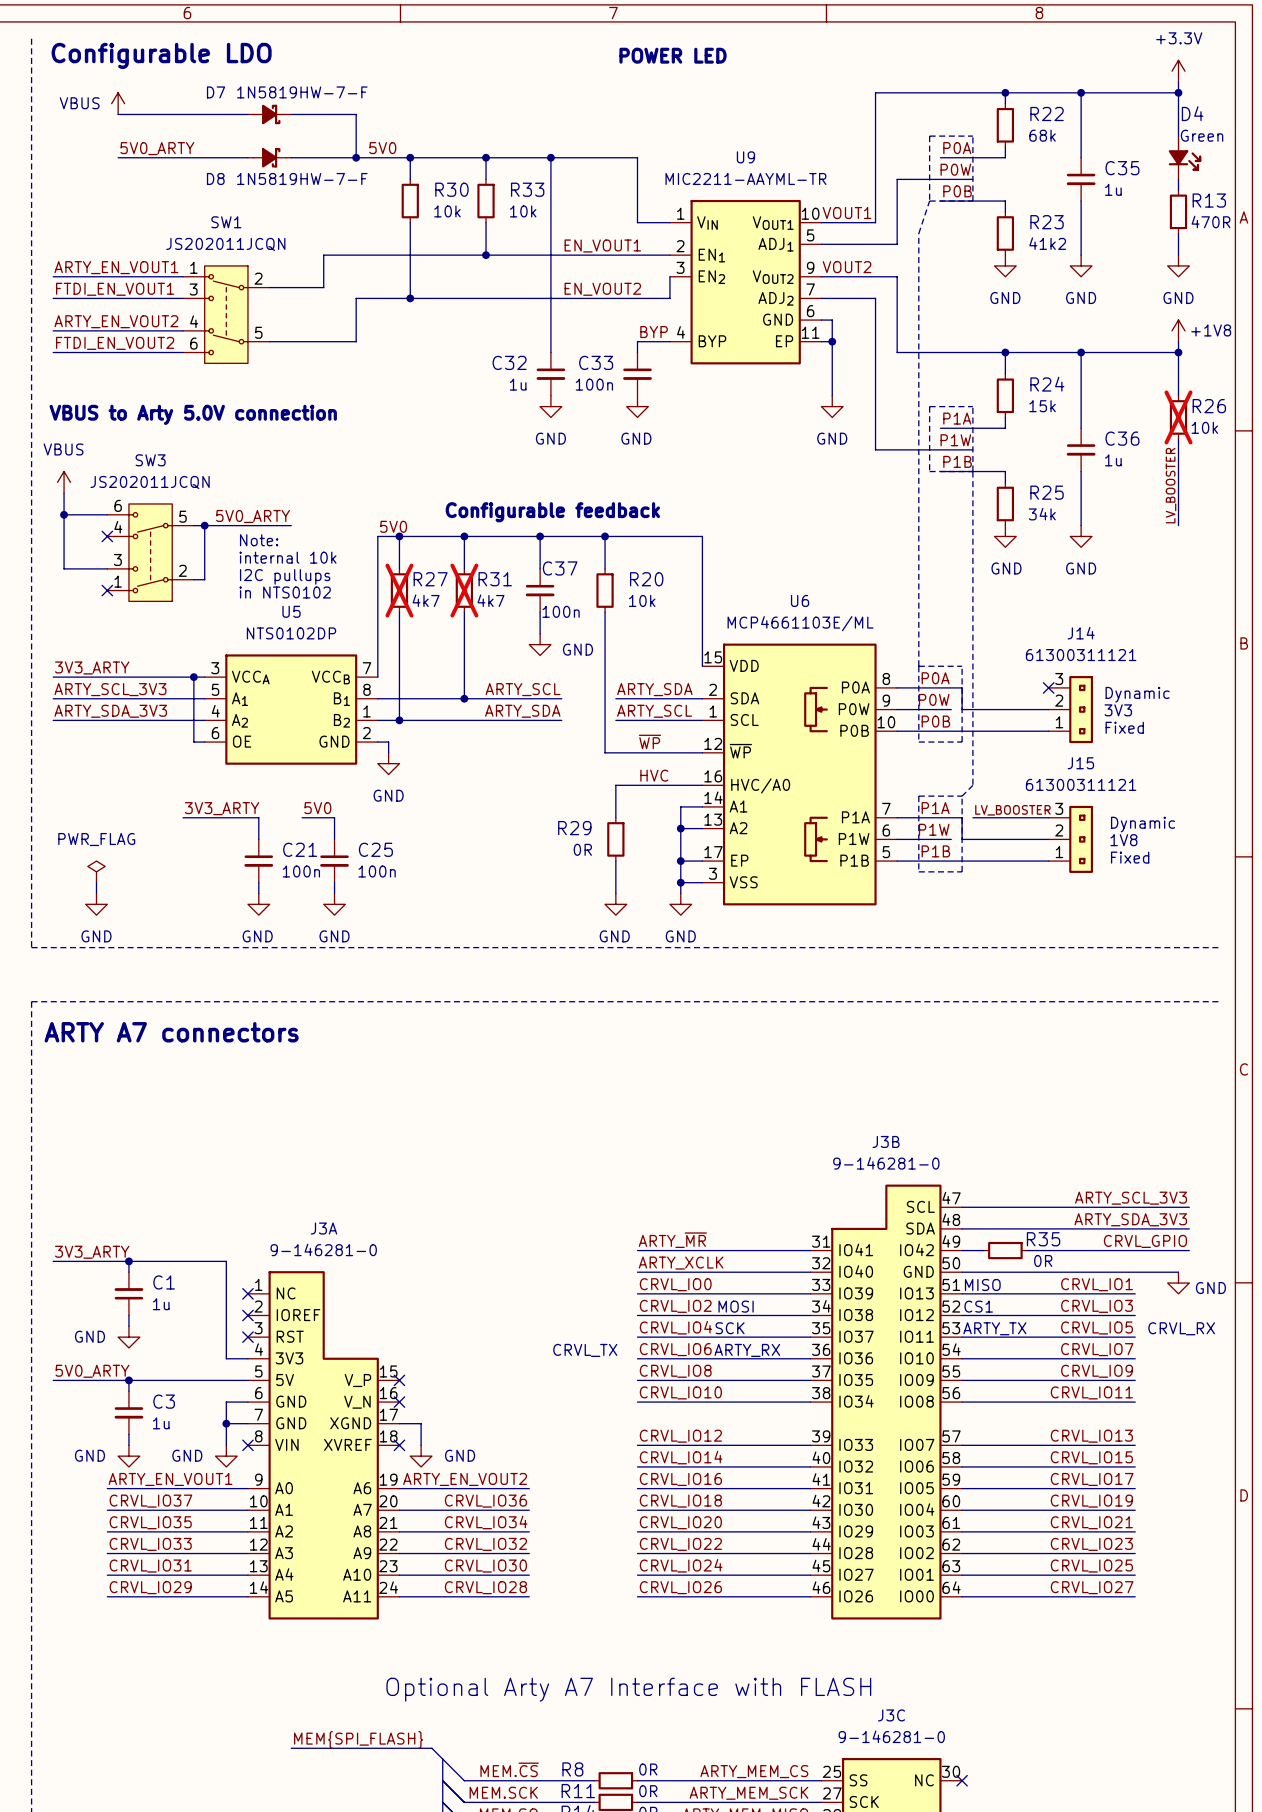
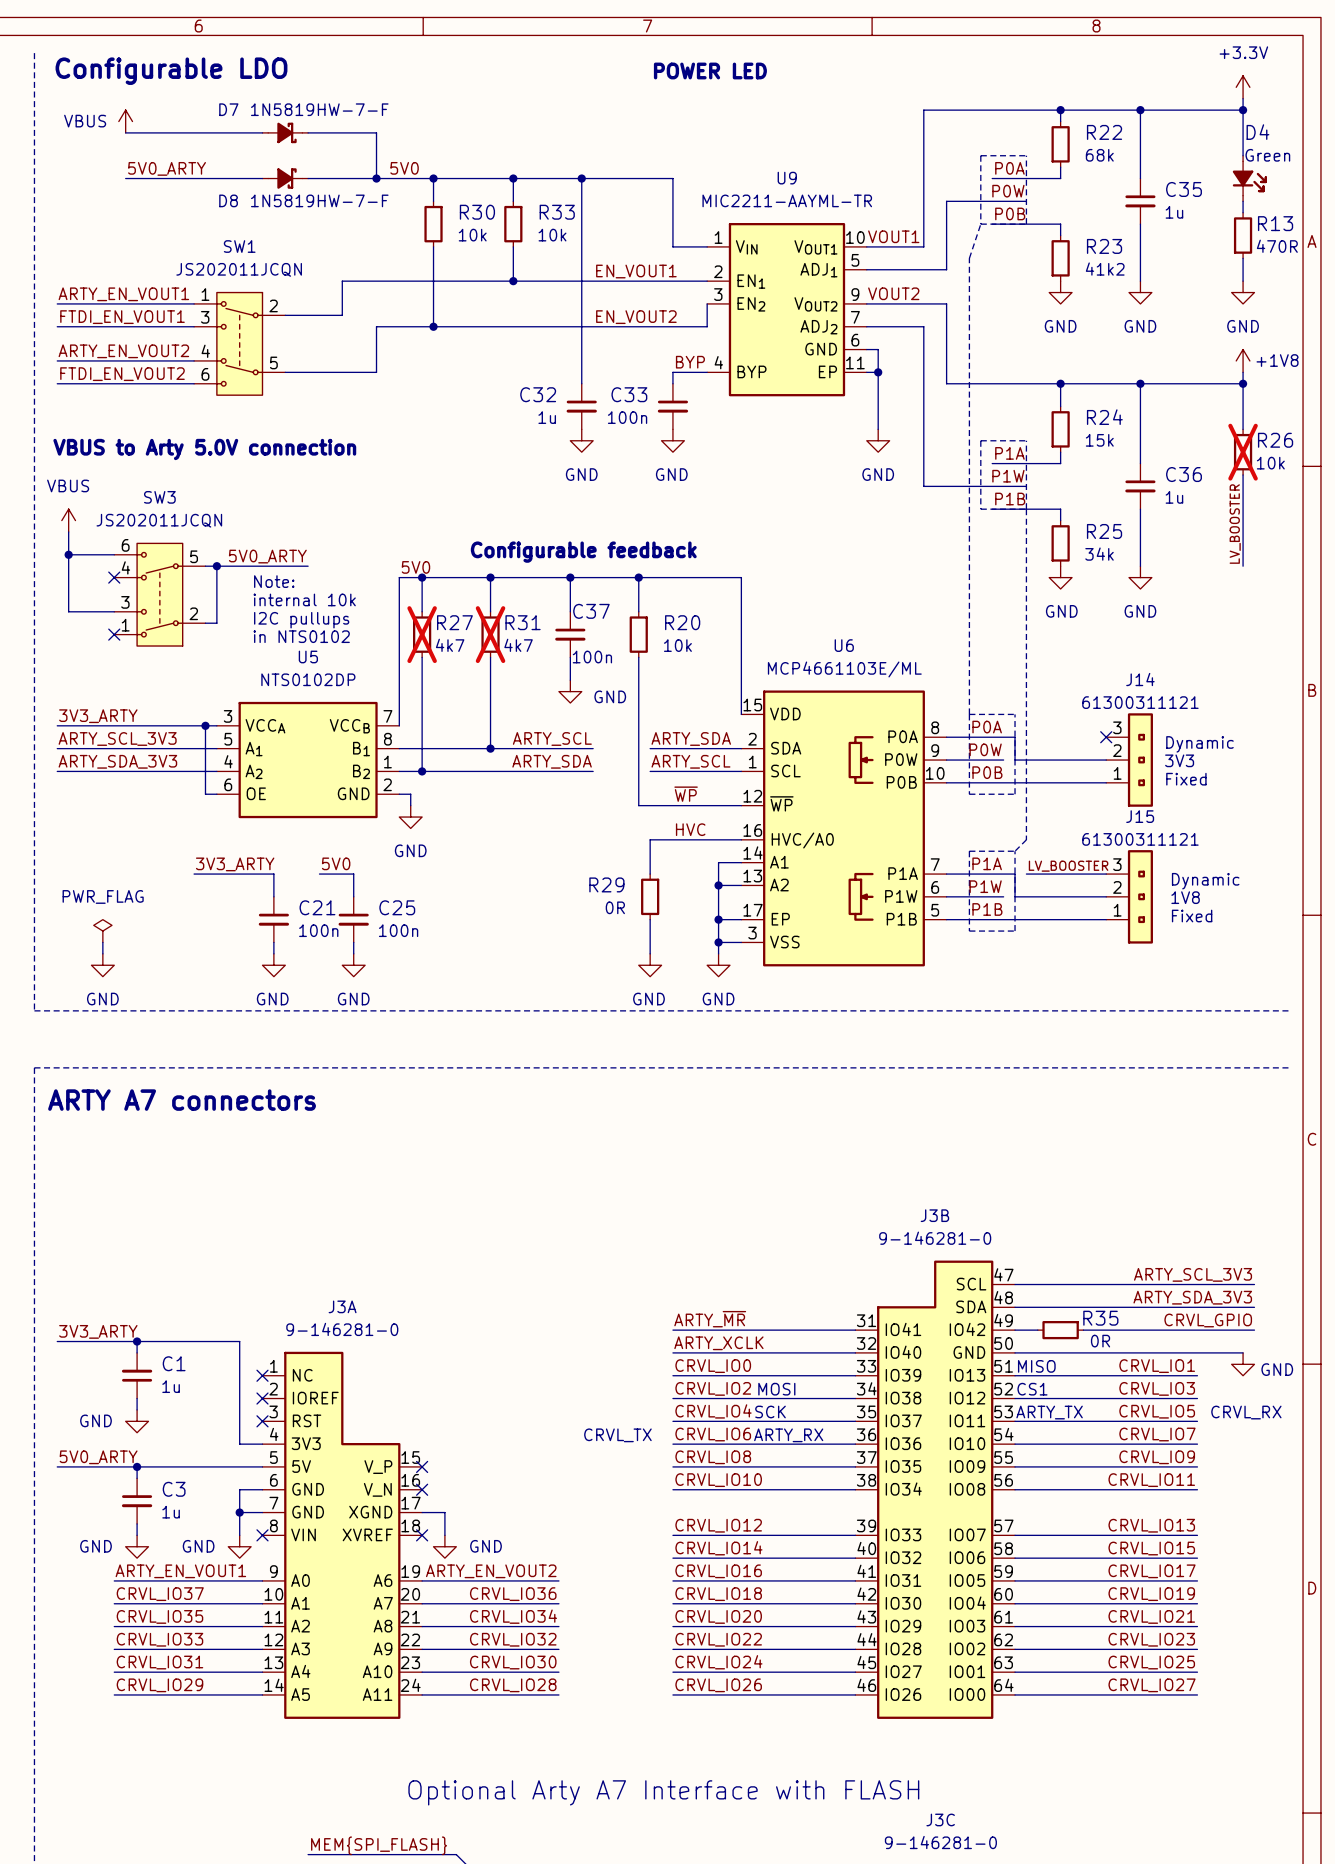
J14 symbol: [1048, 676, 1094, 744] -> [1106, 713, 1153, 807]
J15 symbol: [1048, 805, 1094, 873] -> [1106, 850, 1153, 944]

